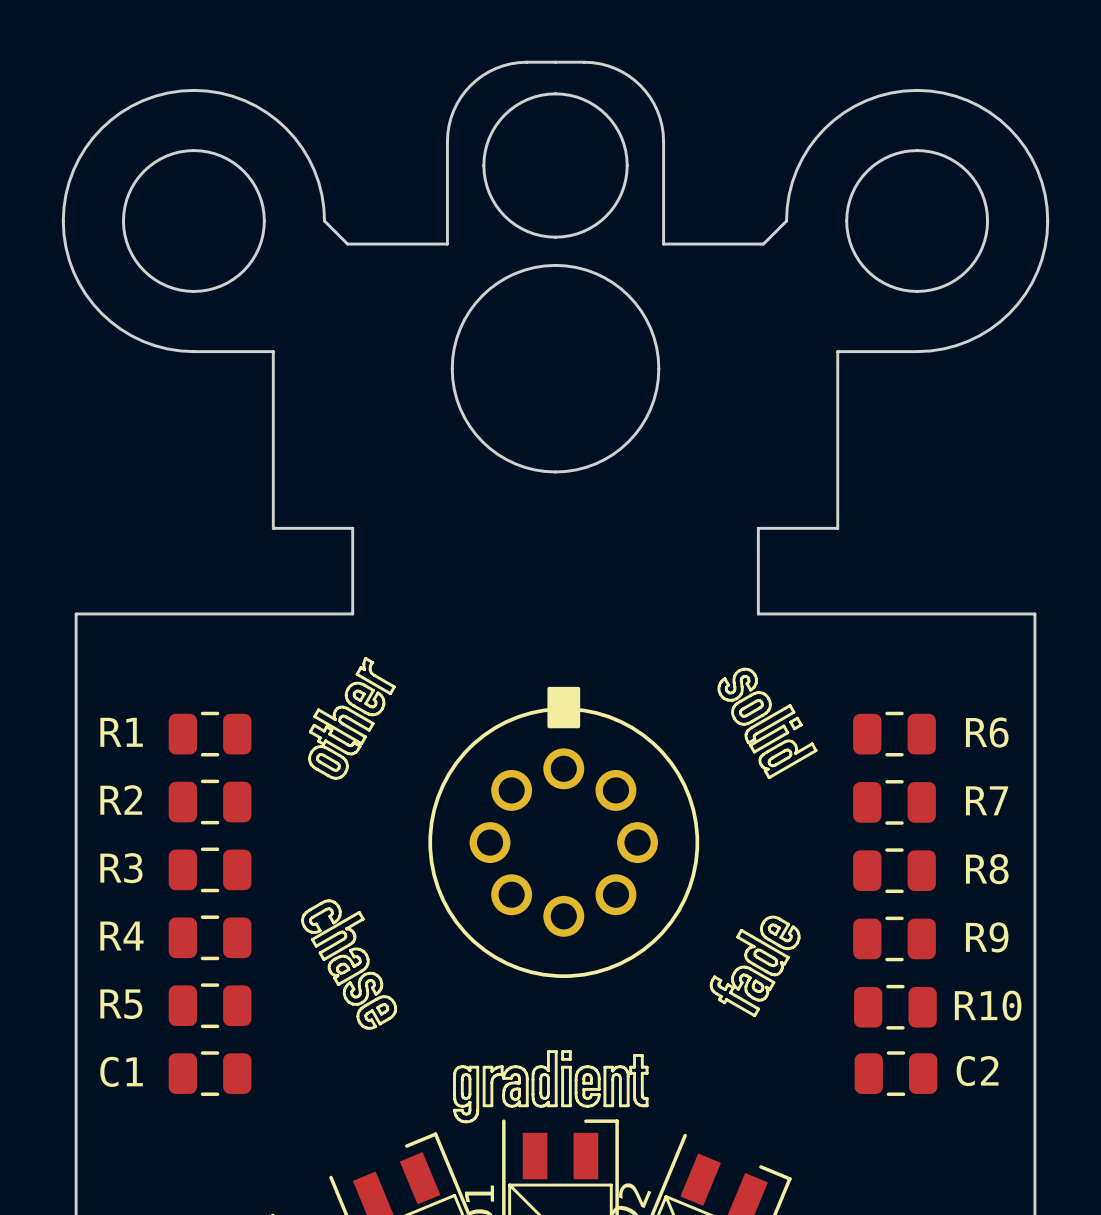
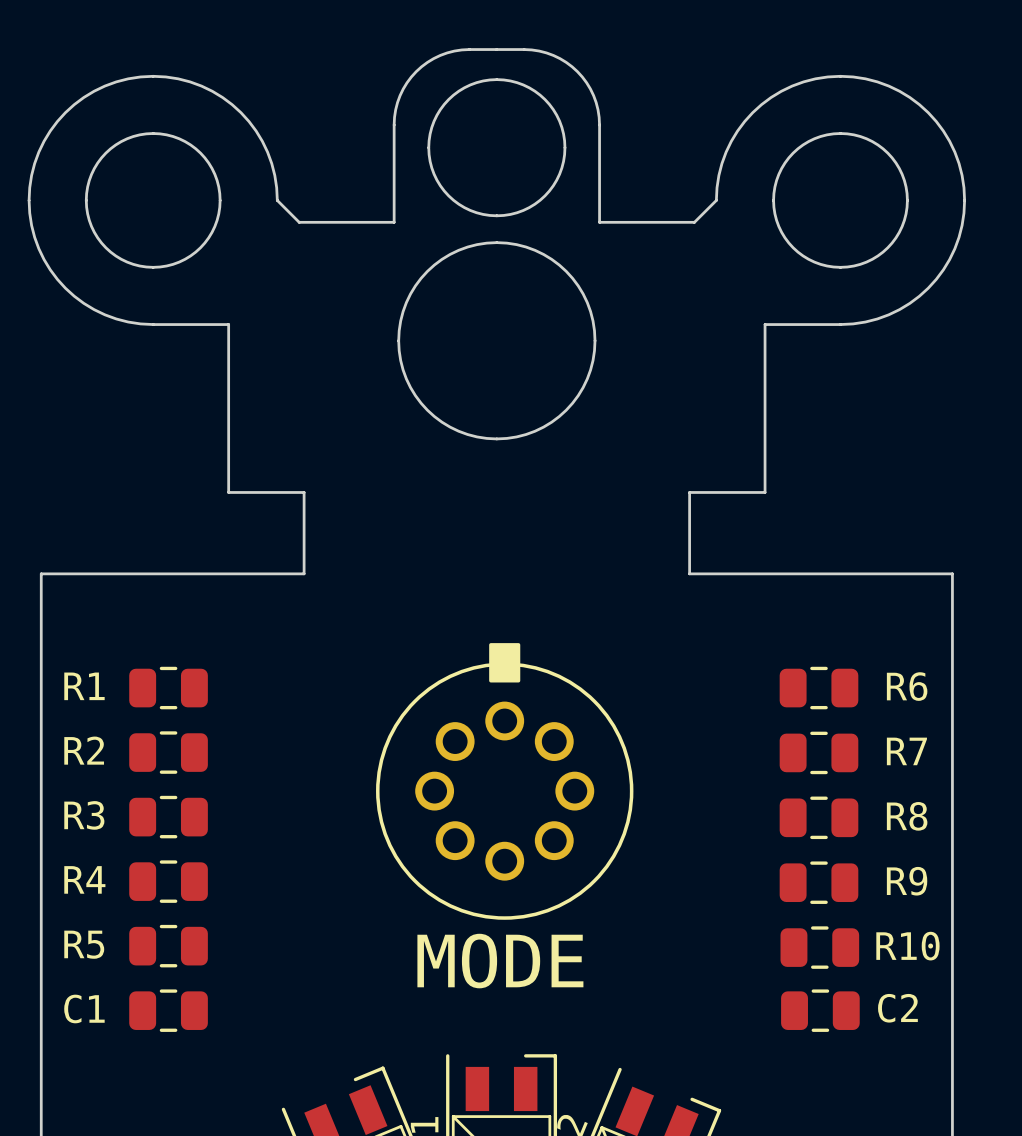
line: (365, 658) (372, 662) (370, 668) (372, 673) (394, 686) (390, 693) (357, 674) (360, 667) (364, 669) (365, 658) -> none
line: (743, 669) (749, 670) (754, 674) (756, 680) (754, 686) (750, 690) (747, 683) (748, 678) (743, 676) (741, 679) (742, 690) (739, 696) (732, 700) (724, 698) (719, 690) (720, 682) (724, 678) (728, 684) (726, 690) (732, 692) (734, 689) (734, 675) (743, 669) -> none
line: (355, 683) (346, 691) (348, 701) (369, 714) (379, 712) (383, 704) (381, 695) (377, 692) (374, 699) (375, 704) (370, 706) (365, 703) (373, 690) (361, 683) (355, 683) -> none
line: (357, 691) (354, 696) (360, 700) (364, 694) (357, 691) -> none
line: (758, 692) (764, 694) (768, 698) (770, 704) (768, 710) (747, 723) (737, 722) (732, 714) (734, 706) (758, 692) -> none
line: (759, 700) (741, 709) (741, 715) (745, 715) (760, 707) (762, 703) (759, 700) -> none
line: (790, 705) (748, 729) (746, 735) (748, 742) (754, 739) (755, 734) (793, 712) (790, 705) -> none
line: (343, 707) (373, 723) (369, 730) (345, 716) (340, 717) (341, 723) (365, 736) (361, 743) (314, 716) (318, 709) (335, 719) (335, 710) (343, 707) -> none
line: (797, 718) (801, 724) (794, 728) (790, 722) (797, 718) -> none
line: (314, 725) (324, 731) (326, 726) (331, 729) (329, 734) (349, 745) (353, 742) (360, 746) (355, 752) (350, 753) (325, 740) (323, 744) (318, 741) (320, 737) (310, 731) (314, 725) -> none
line: (783, 726) (750, 745) (754, 752) (787, 732) (783, 726) -> none
line: (321, 746) (345, 760) (347, 768) (342, 776) (332, 777) (311, 764) (309, 759) (311, 752) (315, 748) (321, 746) -> none
line: (787, 750) (770, 758) (770, 764) (774, 765) (789, 756) (790, 753) (787, 750) -> none
line: (795, 753) (812, 743) (816, 750) (769, 777) (765, 770) (768, 769) (763, 767) (760, 762) (763, 754) (786, 741) (794, 743) (795, 753) -> none
line: (320, 754) (317, 757) (319, 761) (334, 769) (338, 768) (337, 763) (320, 754) -> none
line: (328, 900) (334, 902) (338, 907) (340, 913) (338, 918) (333, 922) (329, 916) (332, 911) (327, 909) (310, 919) (311, 923) (316, 924) (320, 930) (313, 932) (307, 930) (302, 922) (304, 914) (328, 900) -> none
line: (359, 912) (363, 919) (346, 928) (353, 933) (353, 941) (323, 959) (320, 952) (344, 938) (345, 933) (340, 932) (316, 946) (312, 939) (359, 912) -> none
line: (770, 917) (777, 917) (788, 924) (780, 937) (785, 940) (790, 938) (789, 933) (793, 926) (796, 929) (798, 938) (794, 946) (784, 948) (763, 935) (762, 925) (770, 917) -> none
line: (772, 925) (769, 929) (775, 934) (779, 927) (772, 925) -> none
line: (754, 946) (737, 937) (741, 930) (788, 957) (784, 964) (781, 962) (782, 967) (779, 973) (771, 974) (747, 960) (746, 952) (754, 946) -> none
line: (359, 949) (367, 956) (366, 966) (338, 984) (334, 977) (337, 975) (332, 974) (329, 970) (330, 963) (336, 958) (344, 956) (349, 959) (354, 966) (360, 960) (357, 957) (354, 956) (350, 950) (359, 949) -> none
line: (757, 950) (754, 953) (756, 956) (771, 965) (775, 964) (774, 958) (757, 950) -> none
line: (344, 964) (338, 966) (339, 972) (348, 969) (344, 964) -> none
line: (369, 973) (375, 974) (379, 978) (381, 984) (379, 990) (376, 994) (372, 987) (373, 982) (369, 980) (366, 983) (367, 994) (365, 1000) (357, 1004) (349, 1002) (344, 994) (346, 986) (350, 982) (353, 989) (352, 994) (358, 996) (360, 993) (360, 979) (369, 973) -> none
line: (714, 976) (720, 980) (719, 986) (725, 989) (728, 984) (733, 987) (730, 992) (758, 1009) (754, 1015) (726, 999) (724, 1002) (719, 999) (721, 996) (713, 991) (711, 986) (714, 976) -> none
line: (755, 980) (762, 985) (760, 991) (753, 988) (755, 980) -> none
line: (766, 987) (767, 992) (765, 997) (761, 1000) (756, 999) (746, 990) (750, 977) (741, 975) (740, 979) (742, 982) (738, 989) (733, 983) (733, 975) (739, 968) (748, 967) (773, 982) (770, 989) (766, 987) -> none
line: (384, 996) (390, 998) (394, 1003) (395, 1009) (393, 1014) (380, 1023) (372, 1010) (365, 1017) (367, 1020) (371, 1019) (375, 1026) (369, 1028) (363, 1026) (358, 1018) (359, 1010) (384, 996) -> none
line: (384, 1004) (377, 1007) (381, 1014) (387, 1009) (384, 1004) -> none
text: none -> MODE (500, 961)
line: (548, 1051) (556, 1051) (556, 1105) (548, 1105) (548, 1102) (544, 1105) (539, 1106) (535, 1104) (533, 1099) (533, 1072) (539, 1066) (544, 1067) (548, 1070) (548, 1051) -> none
line: (562, 1051) (562, 1059) (570, 1059) (570, 1051) (562, 1051) -> none
line: (634, 1055) (642, 1055) (642, 1067) (647, 1067) (647, 1073) (642, 1073) (642, 1096) (647, 1098) (647, 1105) (639, 1104) (634, 1099) (634, 1073) (630, 1073) (630, 1067) (634, 1067) (634, 1055) -> none
line: (462, 1066) (469, 1070) (469, 1067) (477, 1067) (477, 1112) (474, 1118) (467, 1121) (458, 1118) (454, 1110) (462, 1110) (466, 1114) (469, 1111) (469, 1102) (465, 1105) (460, 1106) (454, 1099) (454, 1072) (457, 1068) (462, 1066) -> none
line: (502, 1066) (502, 1074) (496, 1075) (492, 1080) (491, 1105) (484, 1105) (484, 1067) (491, 1067) (491, 1071) (502, 1066) -> none
line: (587, 1066) (596, 1070) (599, 1078) (599, 1089) (583, 1089) (586, 1098) (589, 1097) (591, 1094) (599, 1094) (595, 1103) (587, 1106) (578, 1102) (576, 1092) (577, 1073) (581, 1068) (587, 1066) -> none
line: (620, 1066) (625, 1068) (627, 1073) (628, 1105) (620, 1105) (620, 1078) (616, 1074) (612, 1078) (612, 1105) (604, 1105) (604, 1067) (612, 1067) (612, 1070) (620, 1066) -> none
line: (562, 1067) (570, 1067) (570, 1105) (562, 1105) (562, 1067) -> none
line: (466, 1074) (462, 1079) (462, 1095) (466, 1098) (469, 1094) (469, 1078) (466, 1074) -> none
line: (544, 1074) (540, 1079) (540, 1095) (544, 1098) (548, 1093) (548, 1077) (544, 1074) -> none
line: (587, 1074) (584, 1076) (583, 1083) (591, 1083) (591, 1076) (587, 1074) -> none
line: (517, 1088) (511, 1092) (514, 1099) (519, 1096) (519, 1089) (517, 1088) -> none
line: (519, 1101) (515, 1105) (510, 1106) (505, 1103) (503, 1099) (506, 1085) (519, 1083) (517, 1074) (513, 1075) (511, 1078) (503, 1078) (506, 1070) (513, 1066) (522, 1068) (527, 1075) (527, 1105) (519, 1105) (519, 1101) -> none

